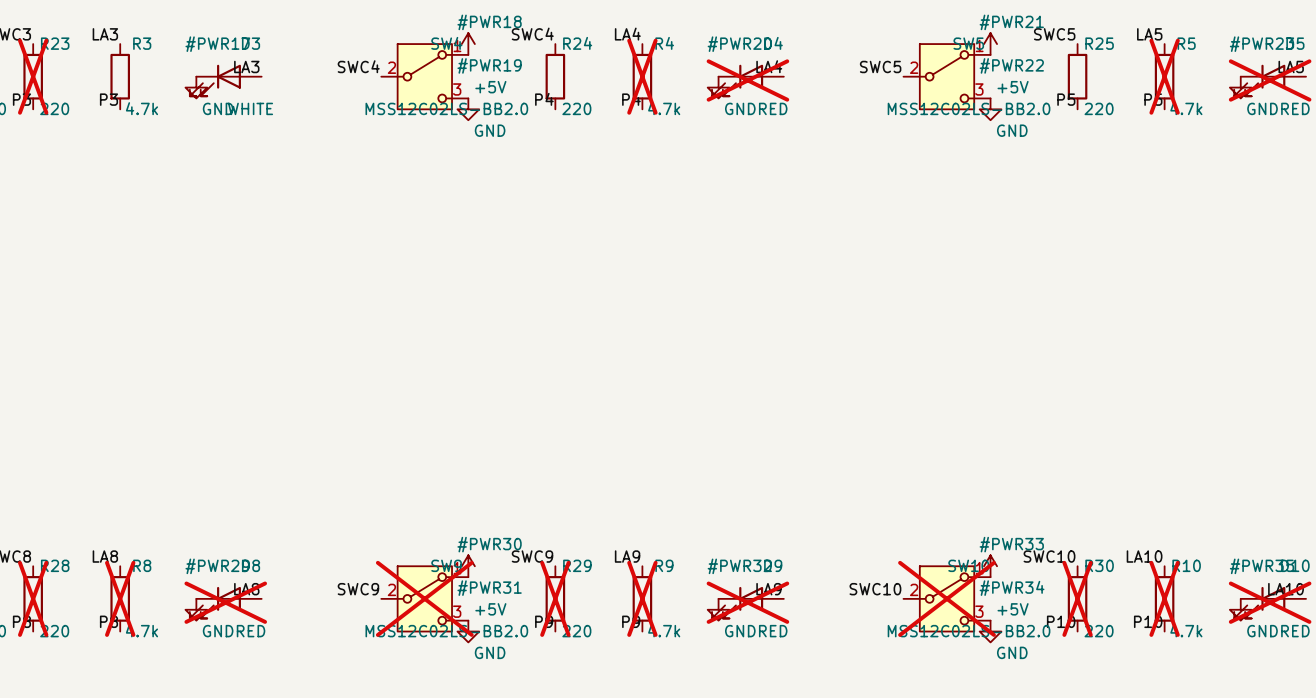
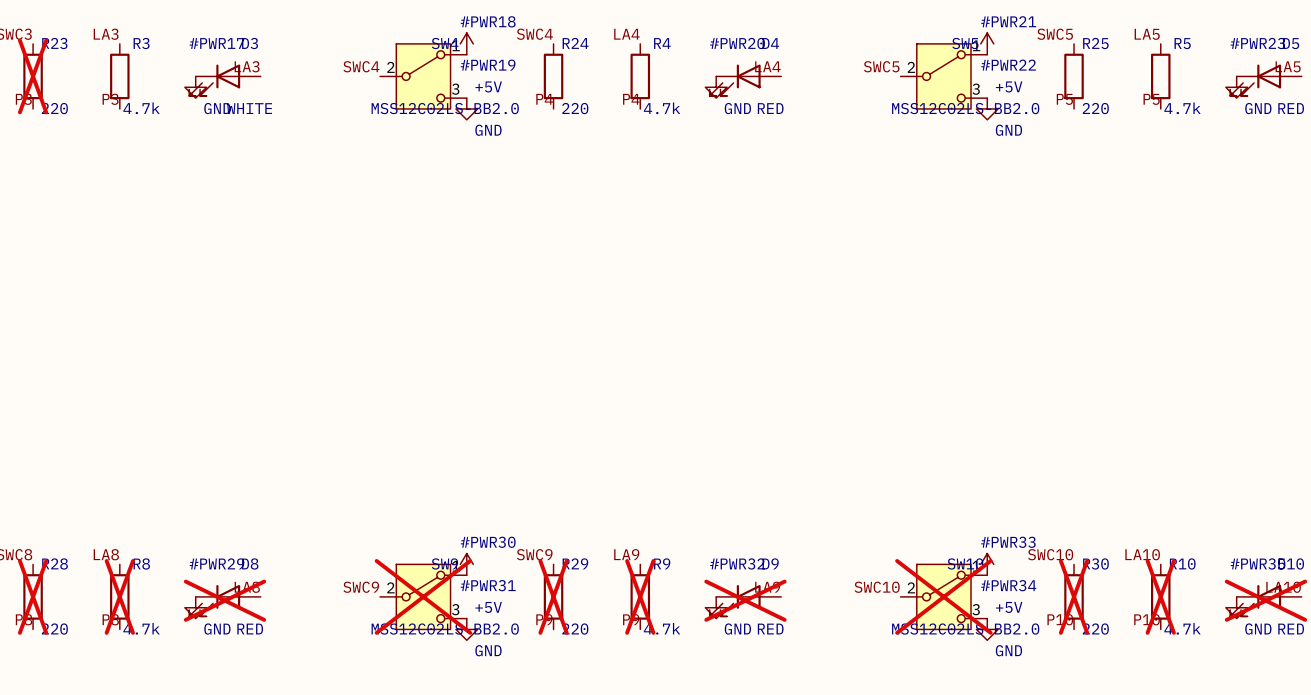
R4 do-not-place cross: (642, 76) -> none
R5 do-not-place cross: (1164, 76) -> none
D4 do-not-place cross: (747, 80) -> none
D5 do-not-place cross: (1270, 80) -> none

